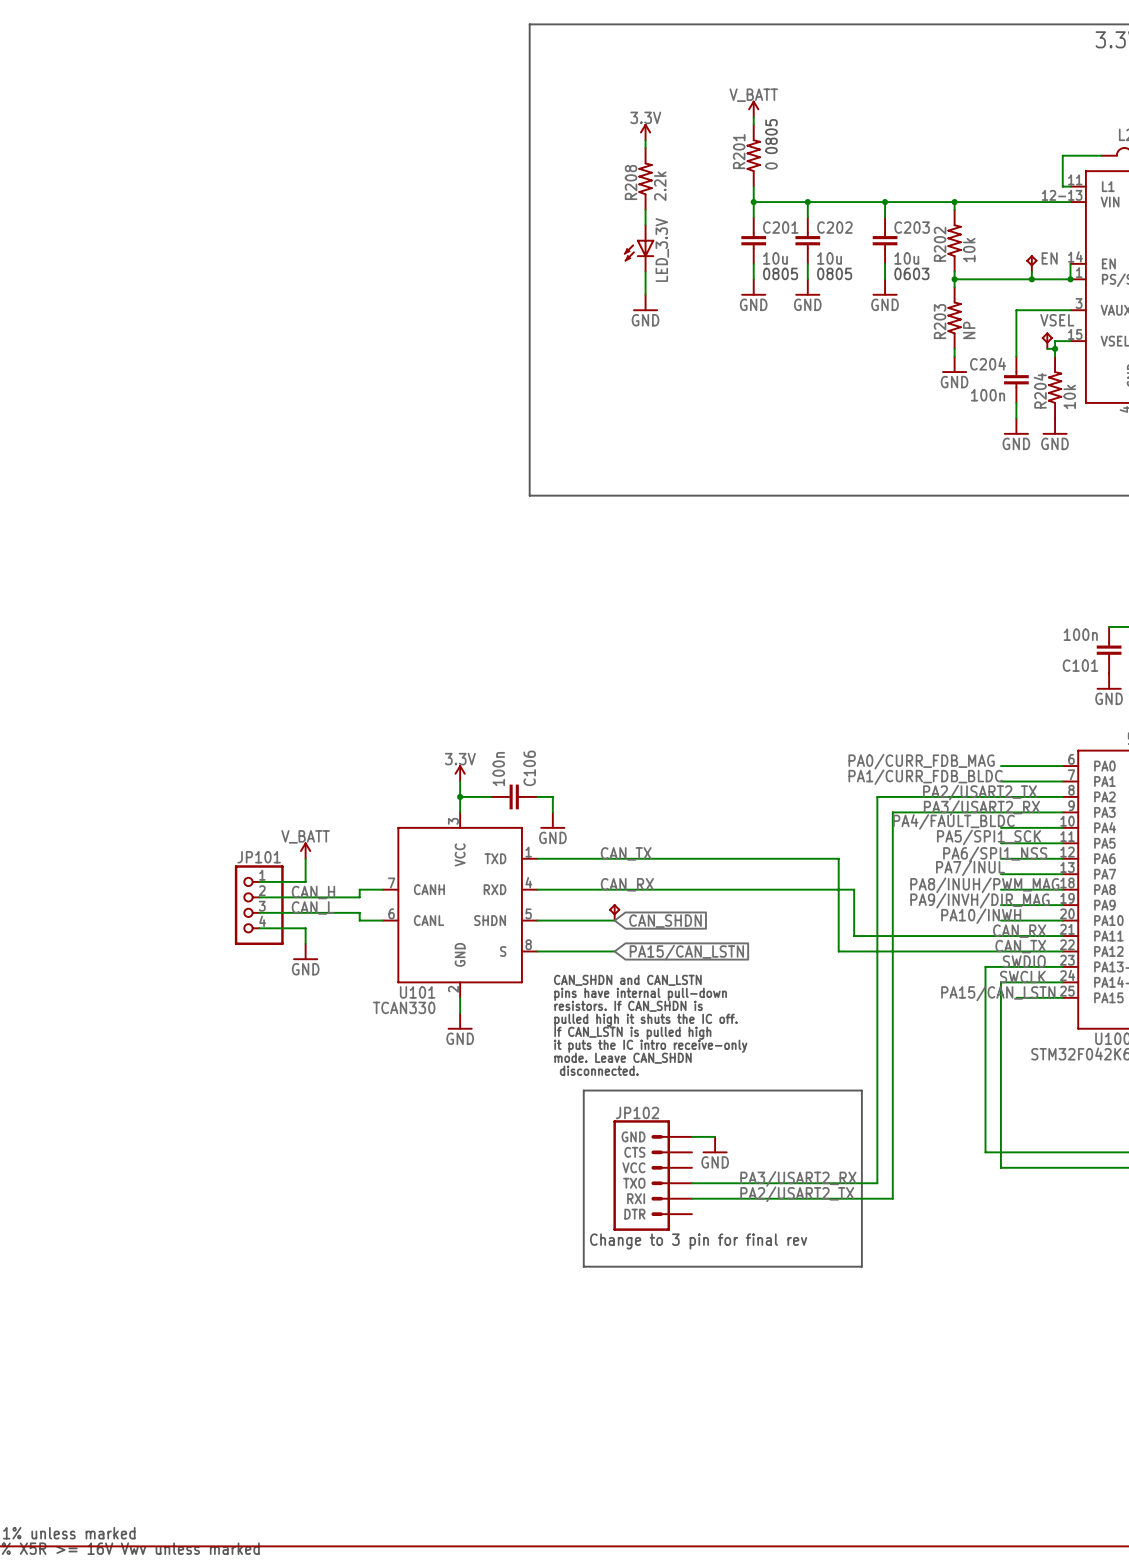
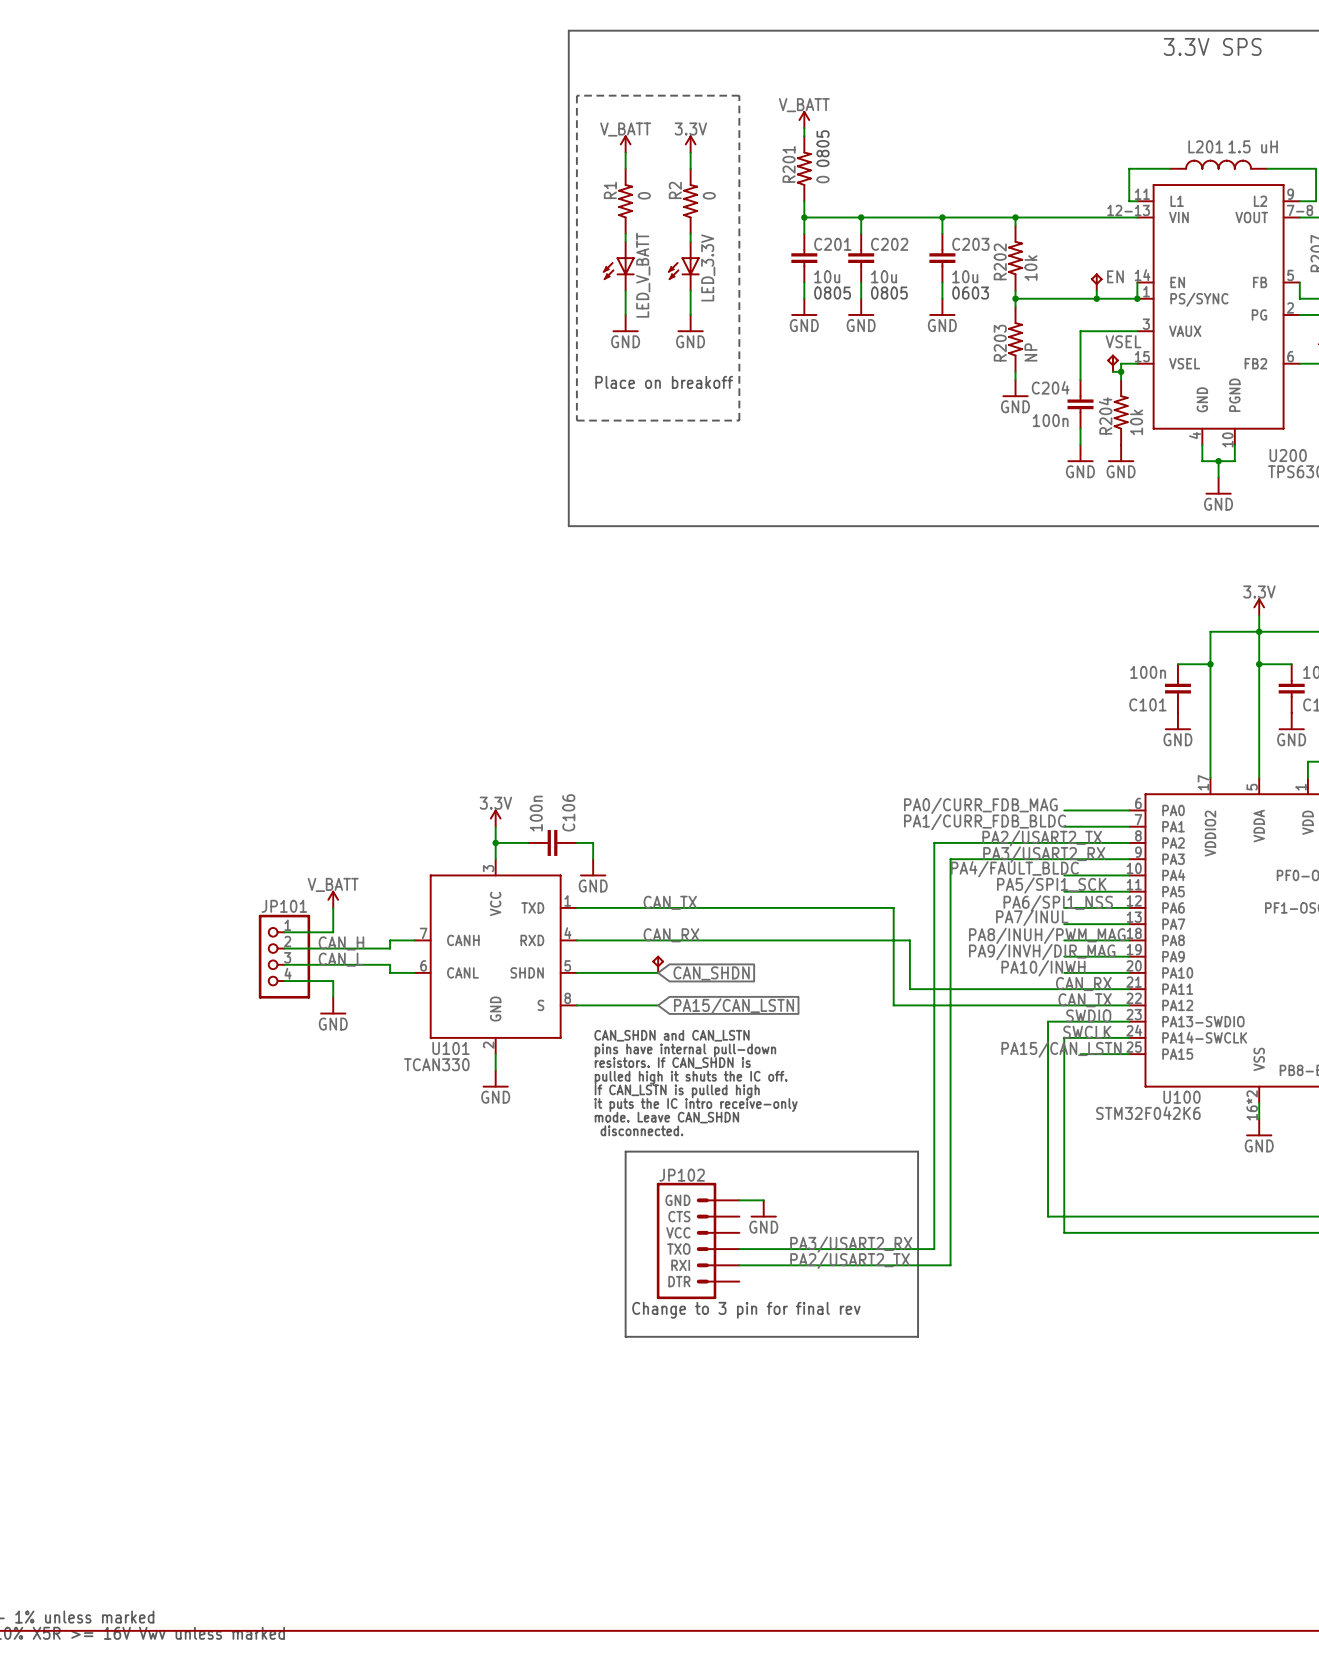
line: none -> (576, 95) (576, 420) (739, 420) (739, 95) (576, 95)
power symbol: none -> V_BATT (625, 144)
wire: none -> (625, 152) (625, 168)
R208: 2.2k (645, 178) -> none
R1: none -> 0 (625, 201)
R2: none -> 0 (690, 201)
wire: none -> (625, 233) (625, 241)
LED_V_BATT: none -> (618, 266)
wire: none -> (625, 290) (625, 314)
power symbol: none -> GND (625, 323)
text: none -> Place on breakoff (664, 382)

